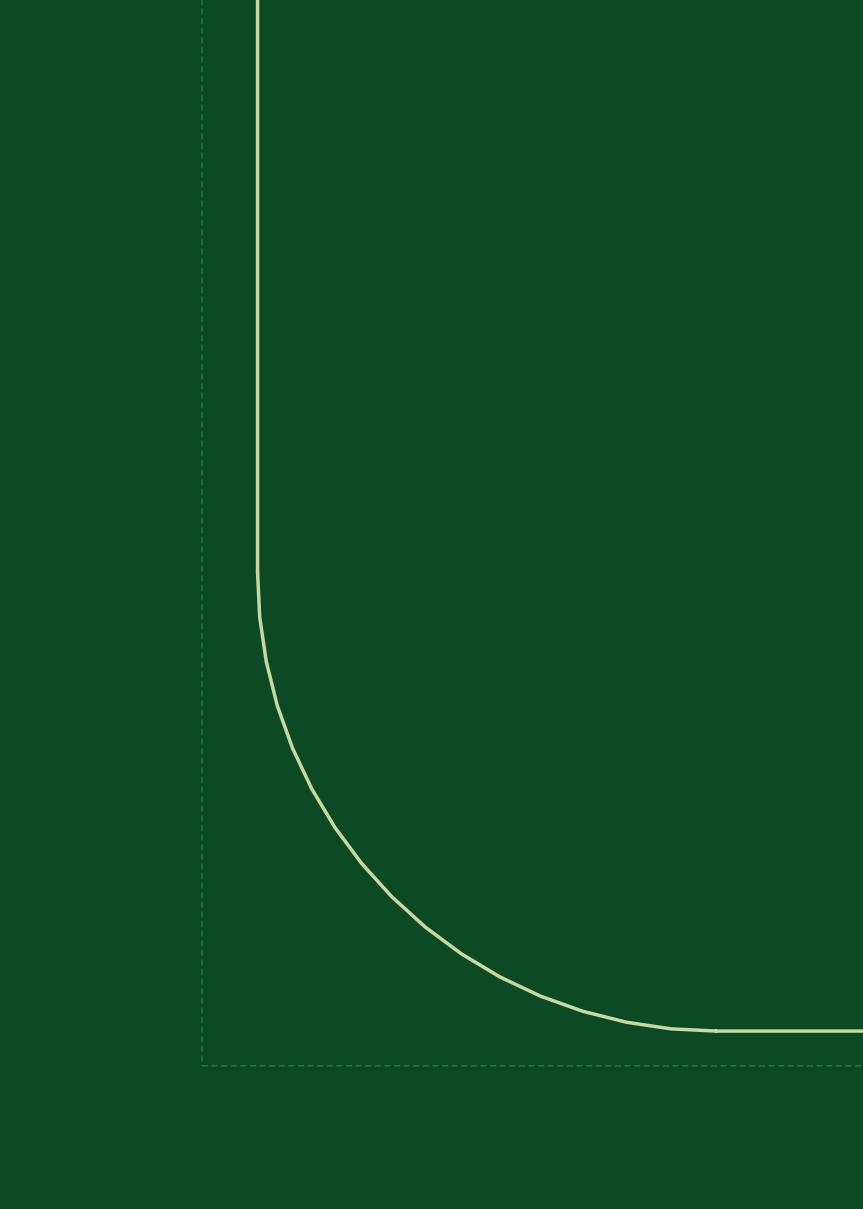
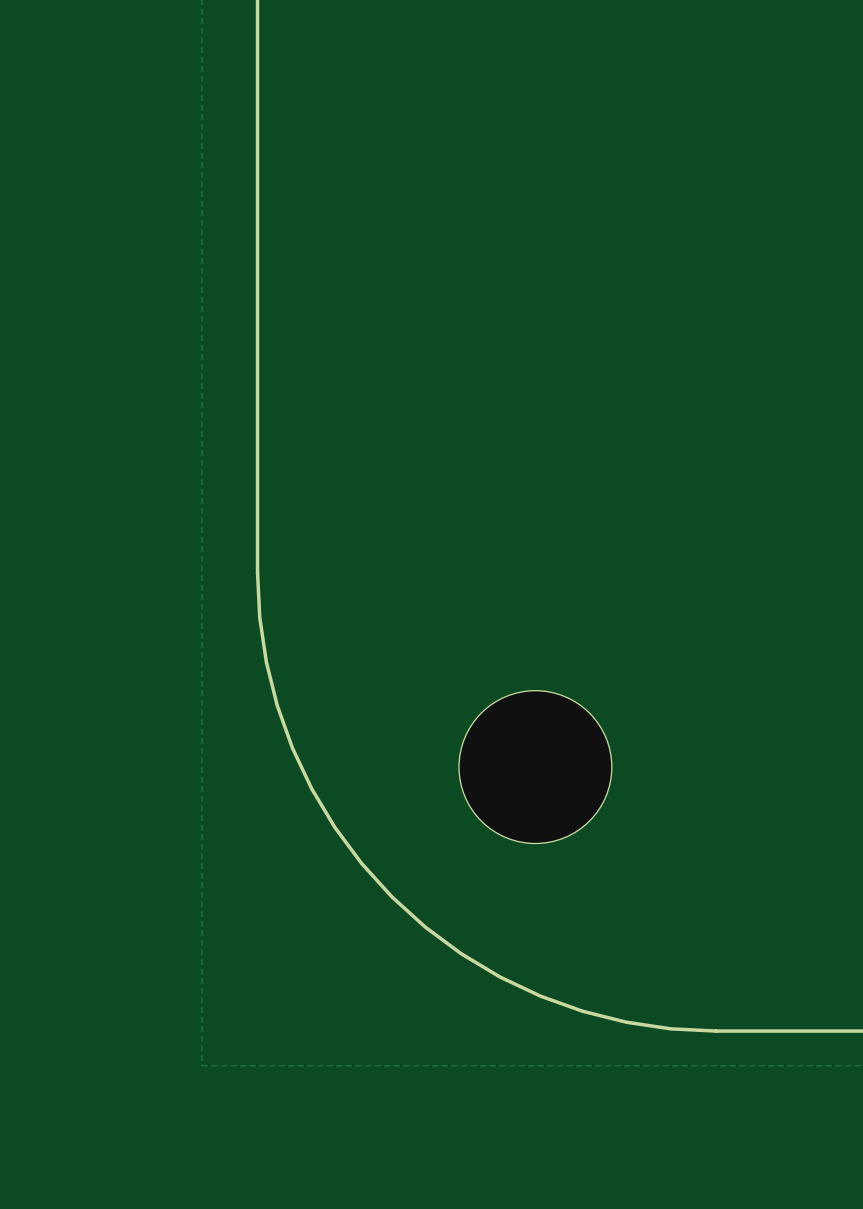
part: none -> (535, 767)

